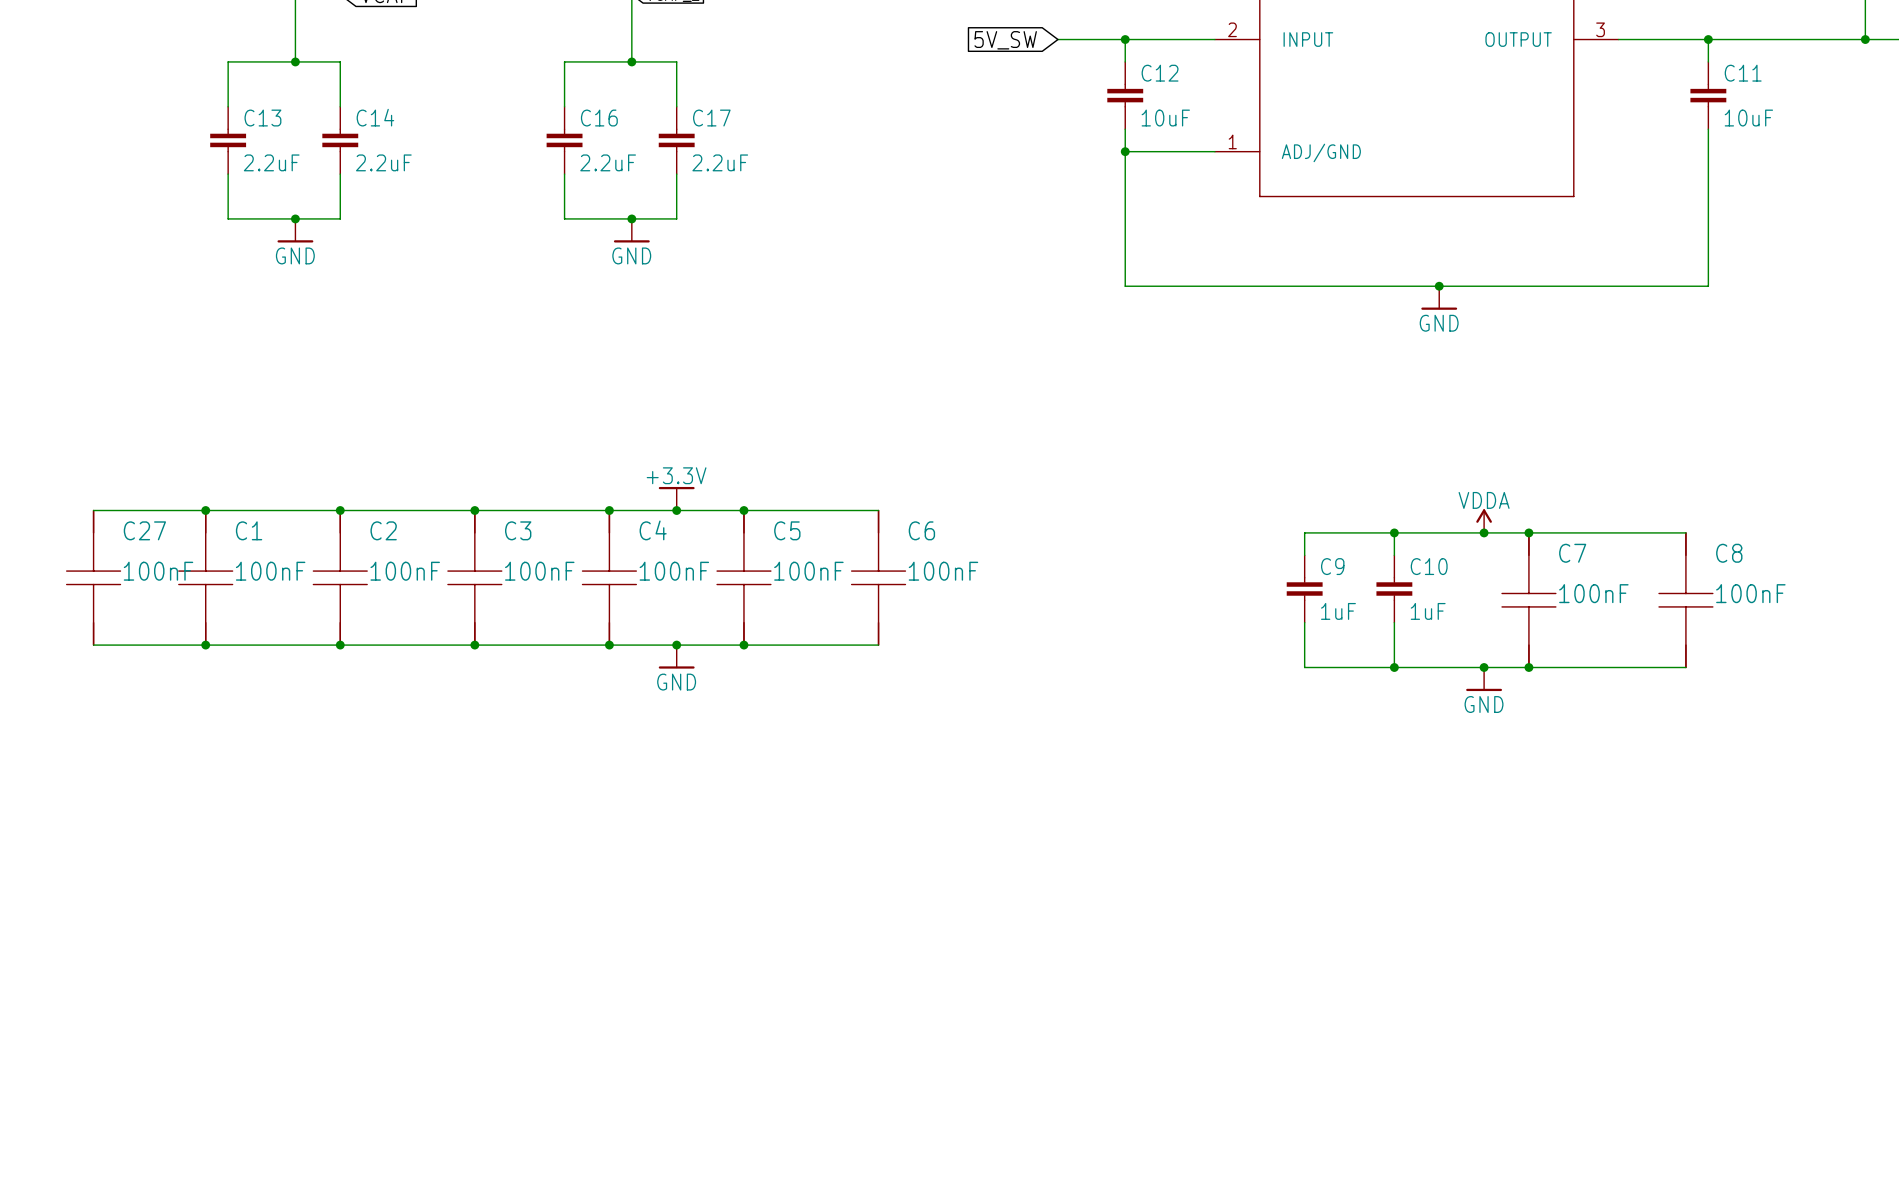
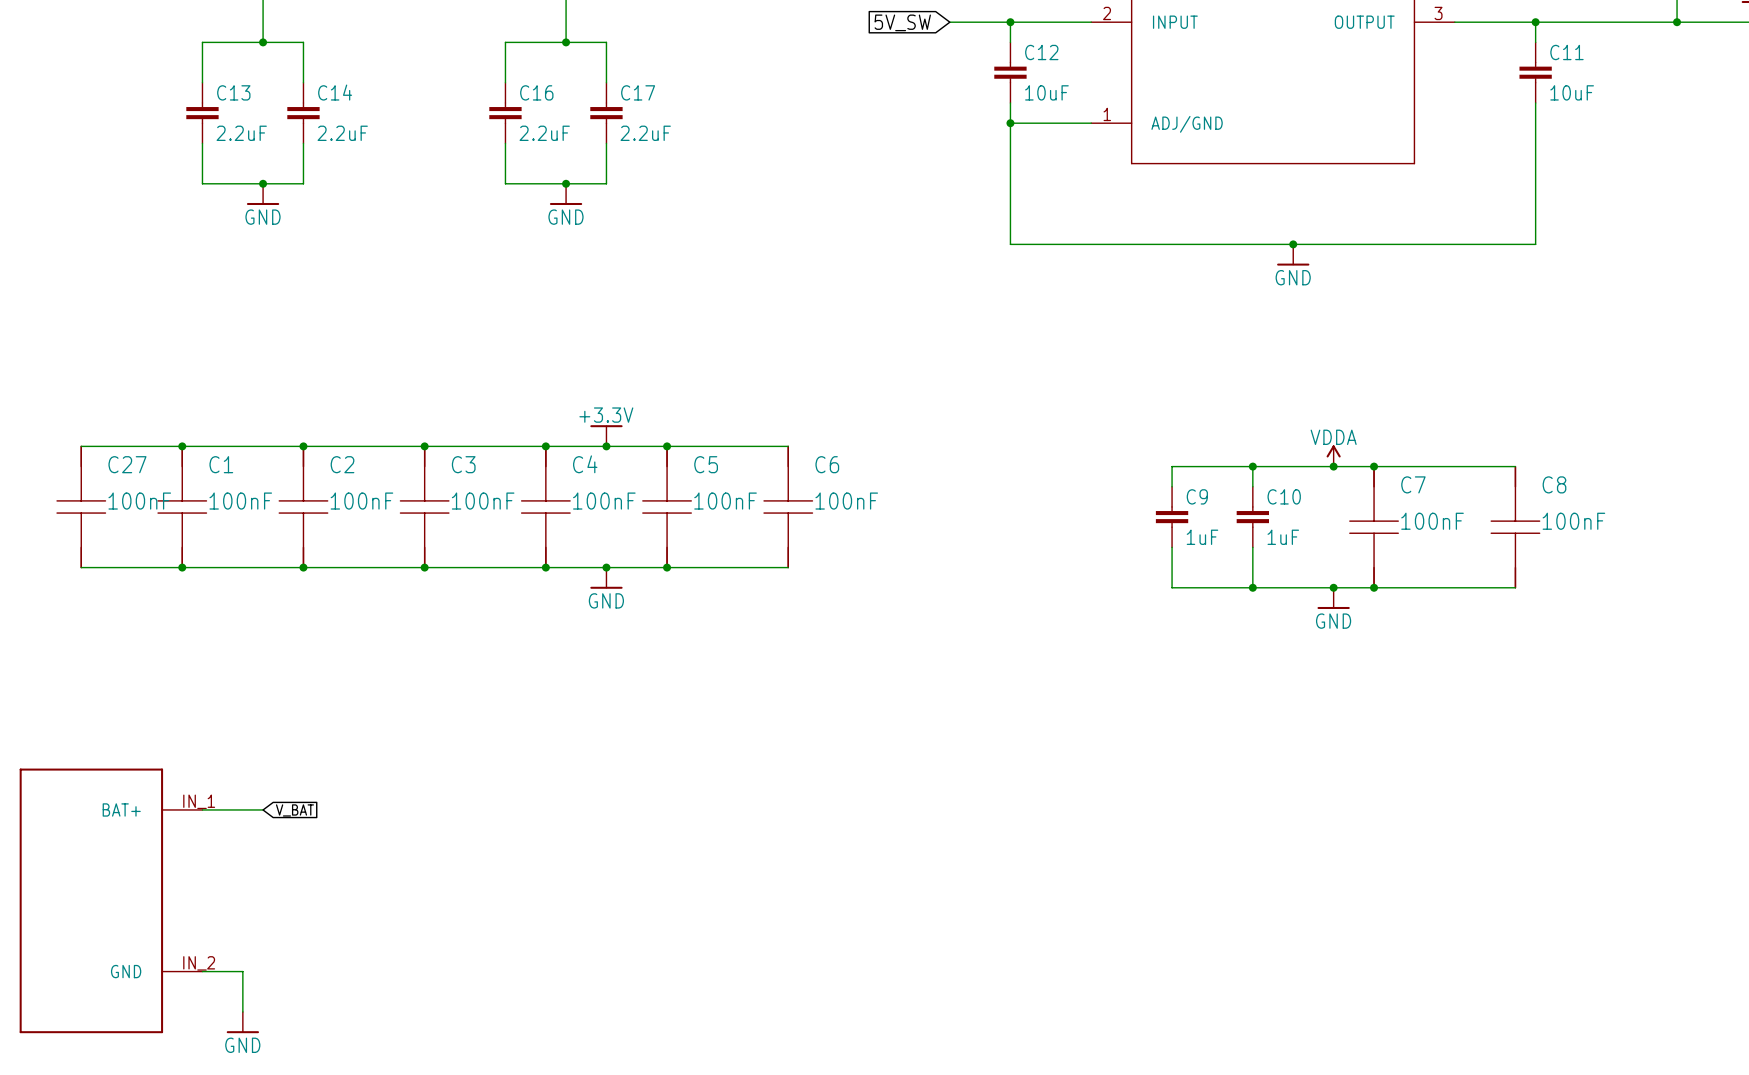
wire: none -> (202, 809) (263, 809)
global label: none -> V_BAT (294, 810)
part: none -> (111, 900)
wire: none -> (202, 971) (242, 971) (242, 1011)
power symbol: none -> GND (242, 1022)

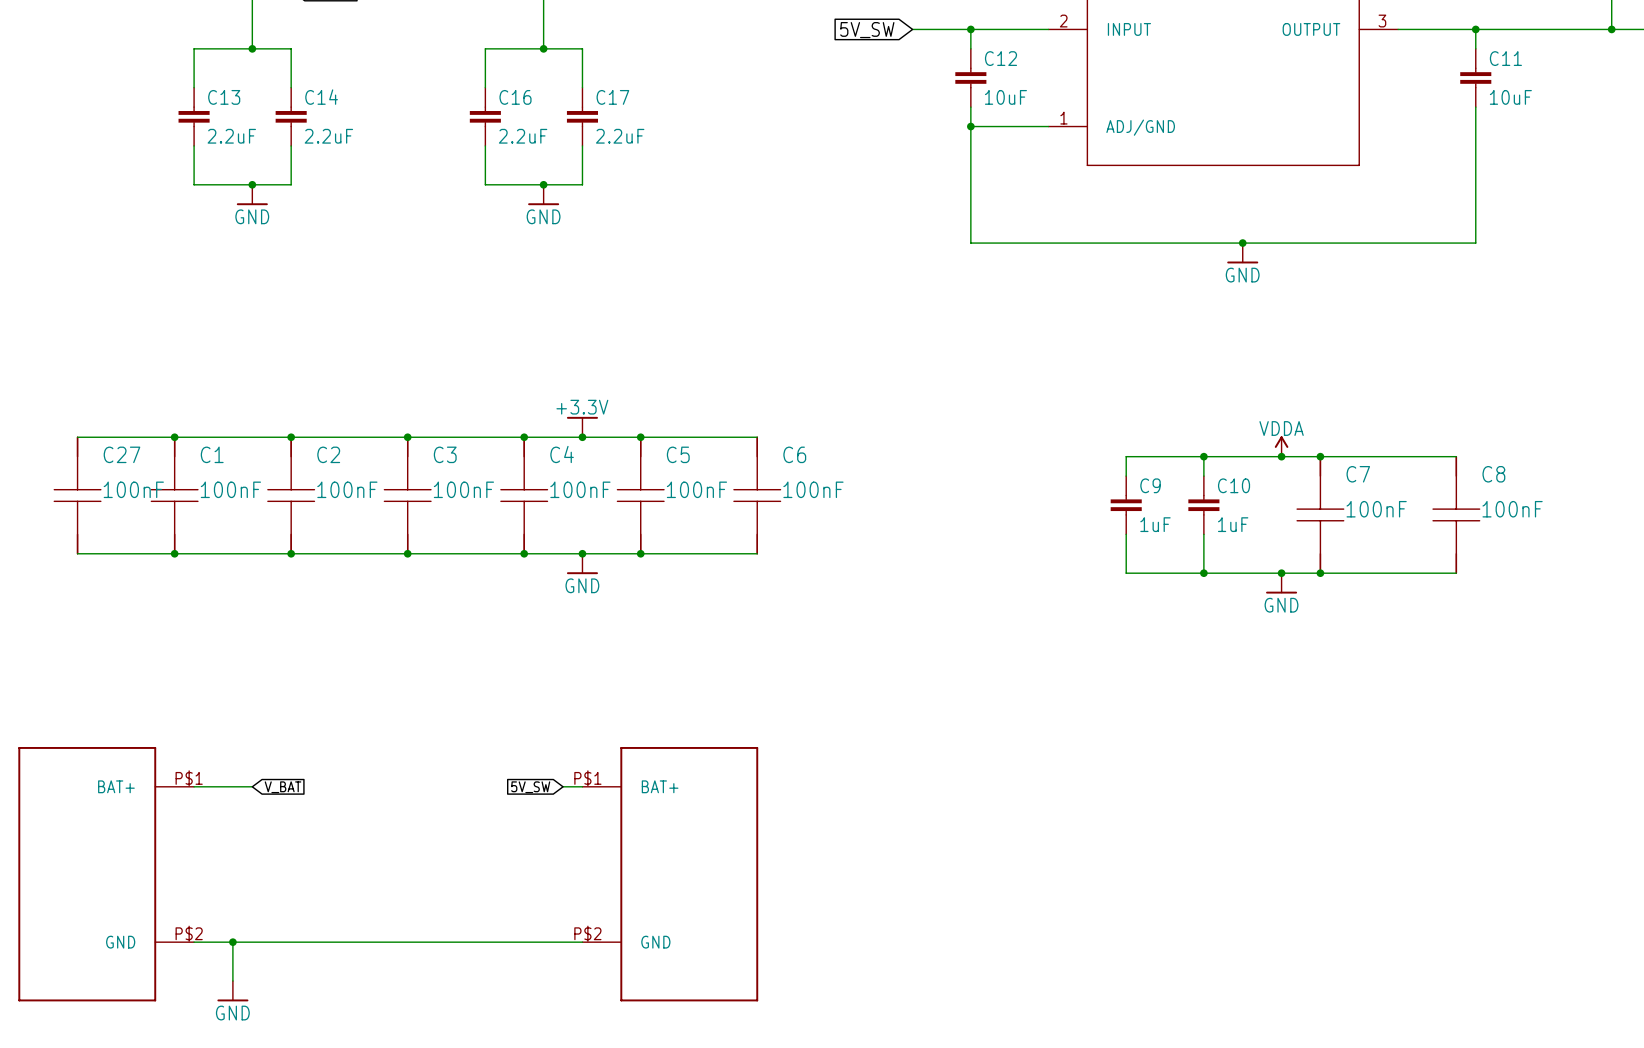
part pin number: IN_1 (199, 801) -> P$1 (189, 778)
wire: none -> (563, 786) (582, 786)
global label: none -> 5V_SW (530, 787)
part: none -> (670, 874)
part pin number: IN_2 (199, 963) -> P$2 (189, 933)
wire: none -> (232, 942) (582, 942)
junction: none -> (232, 942)

